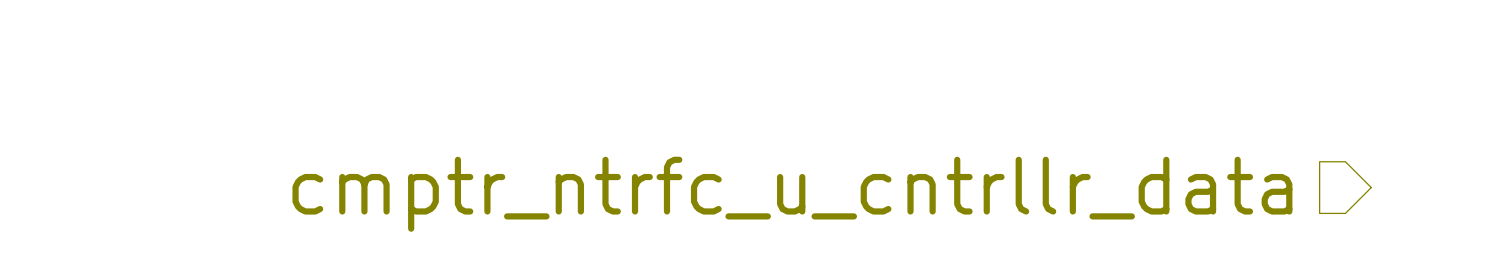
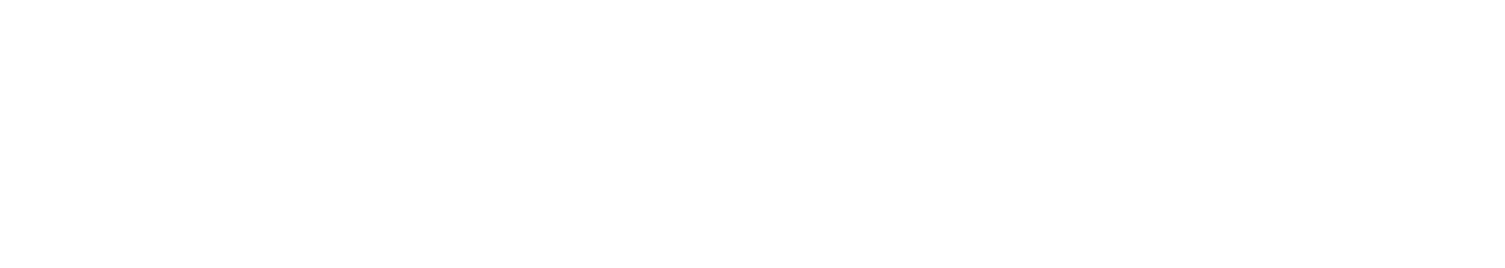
hierarchical label: cmptr_ntrfc_u_cntrllr_data (792, 194) -> none

